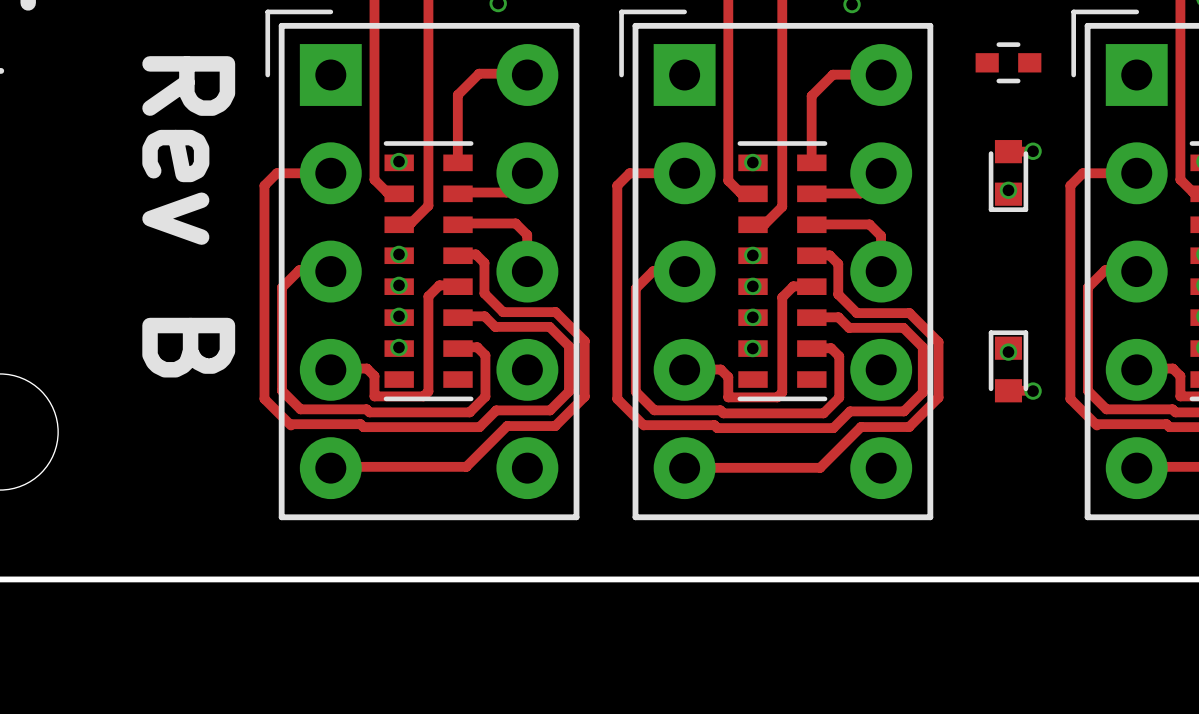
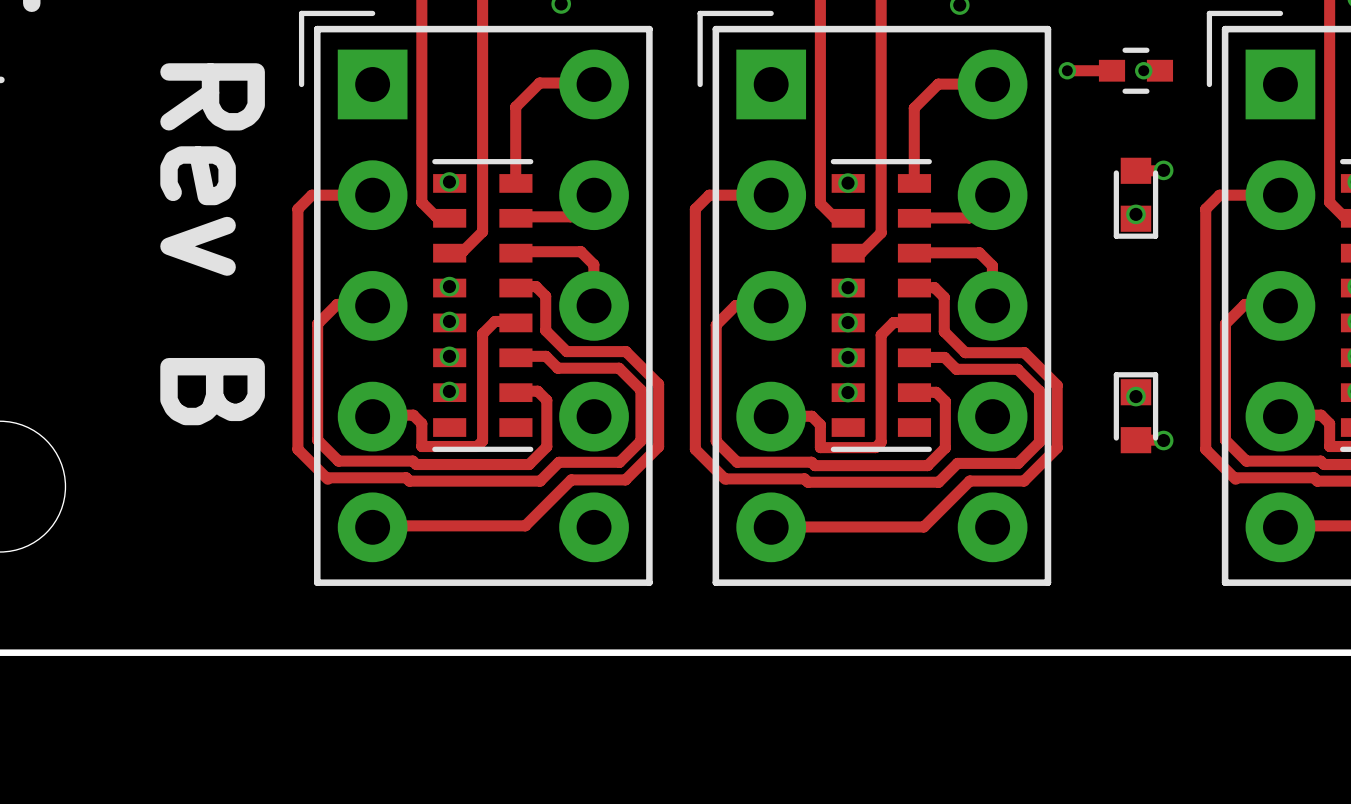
track: none -> (1067, 70) (1112, 70)
via: none -> (1067, 70)
via: none -> (1143, 70)

